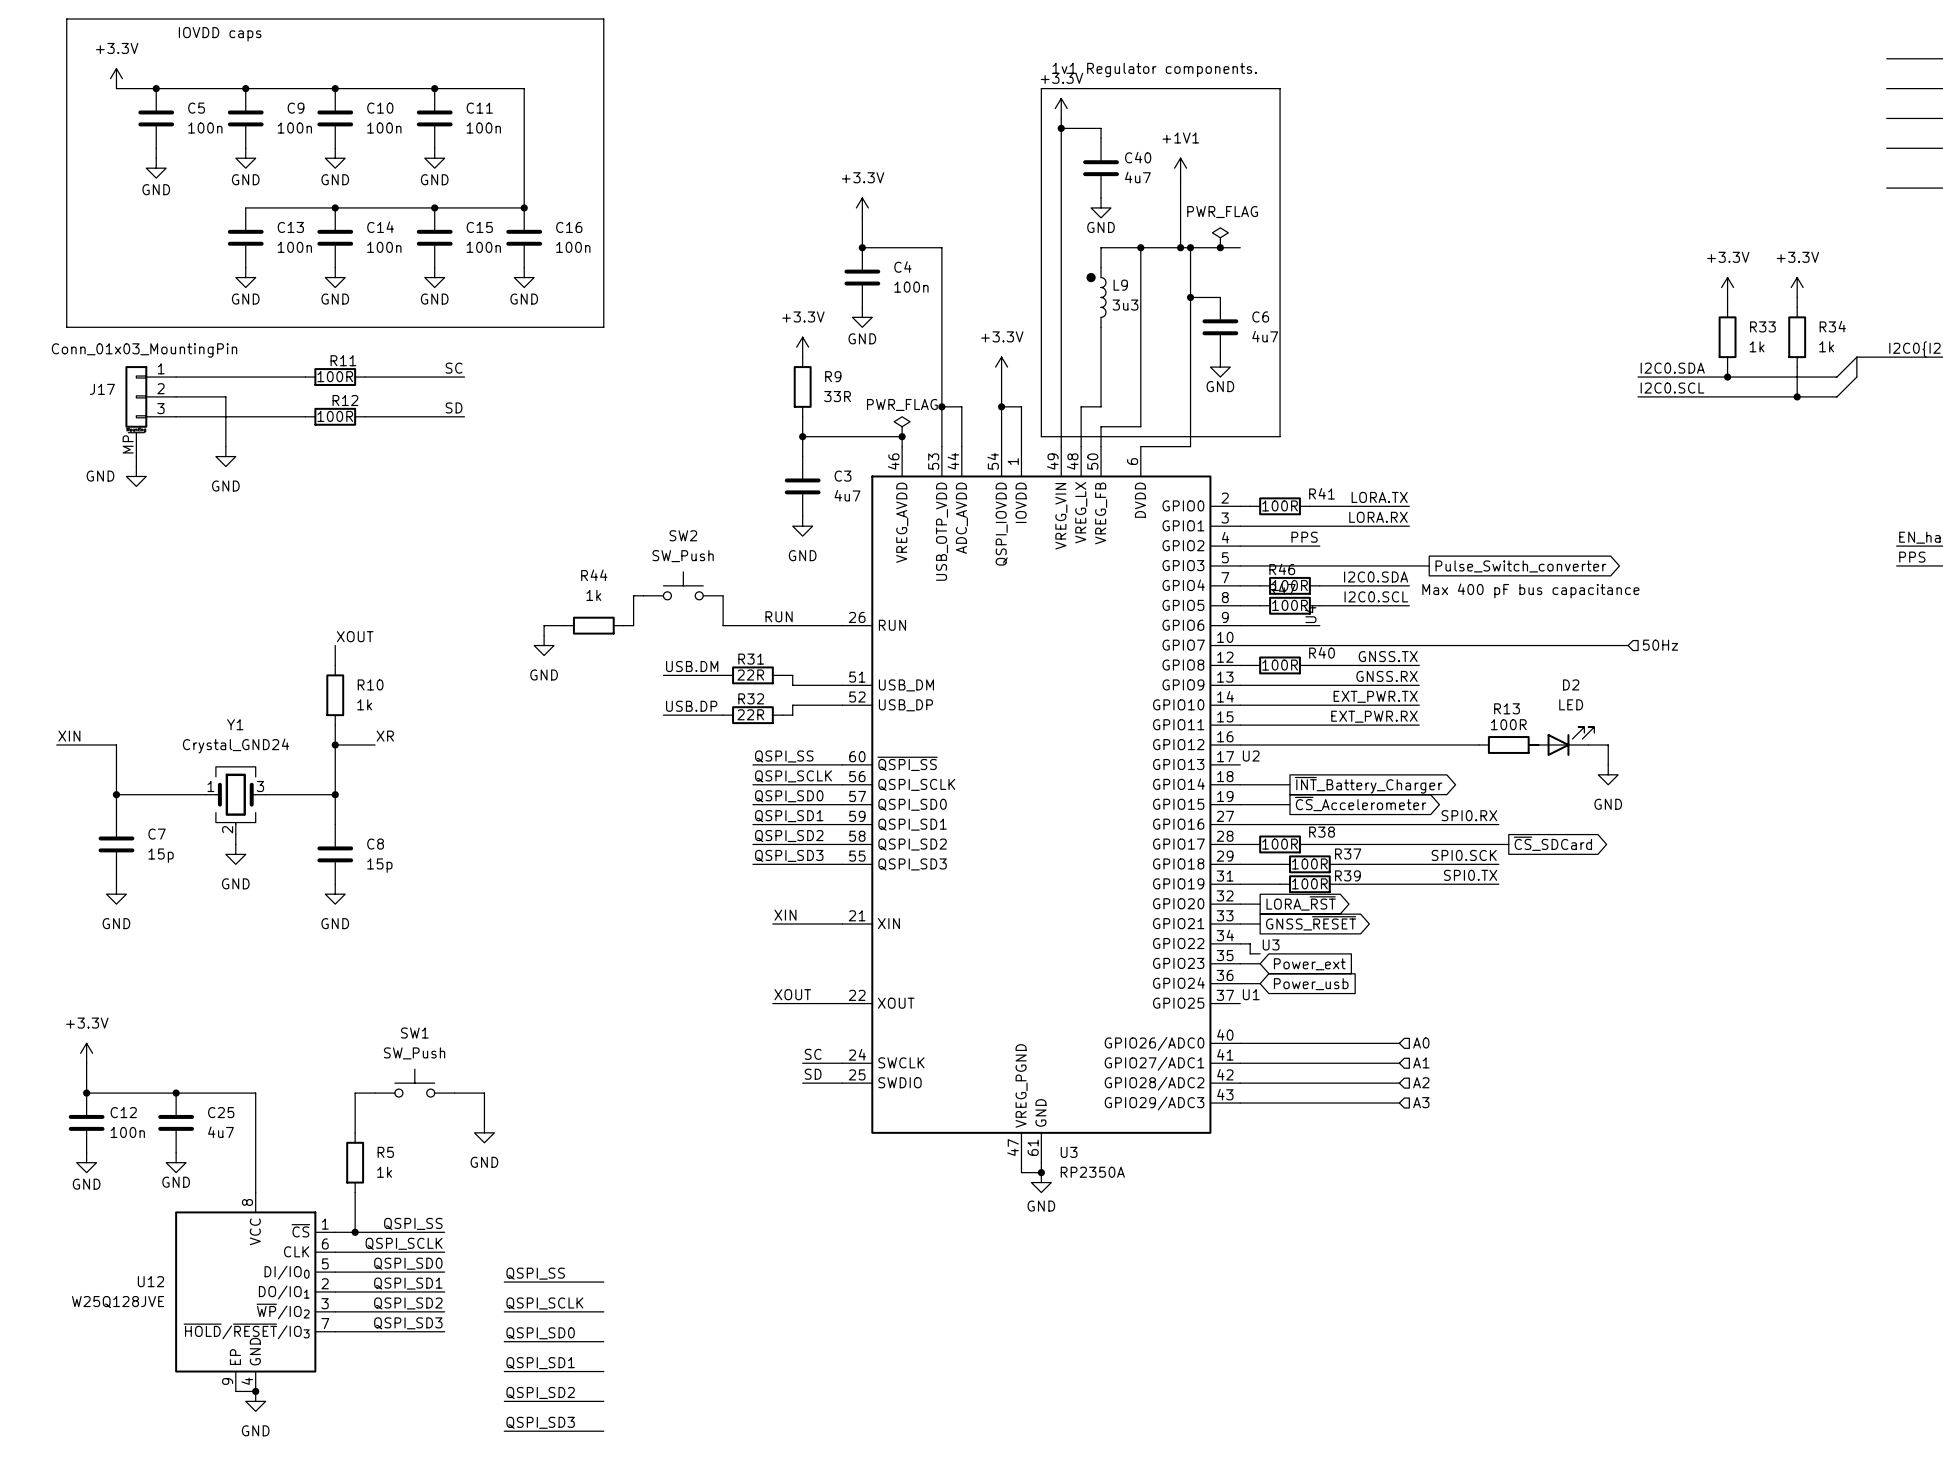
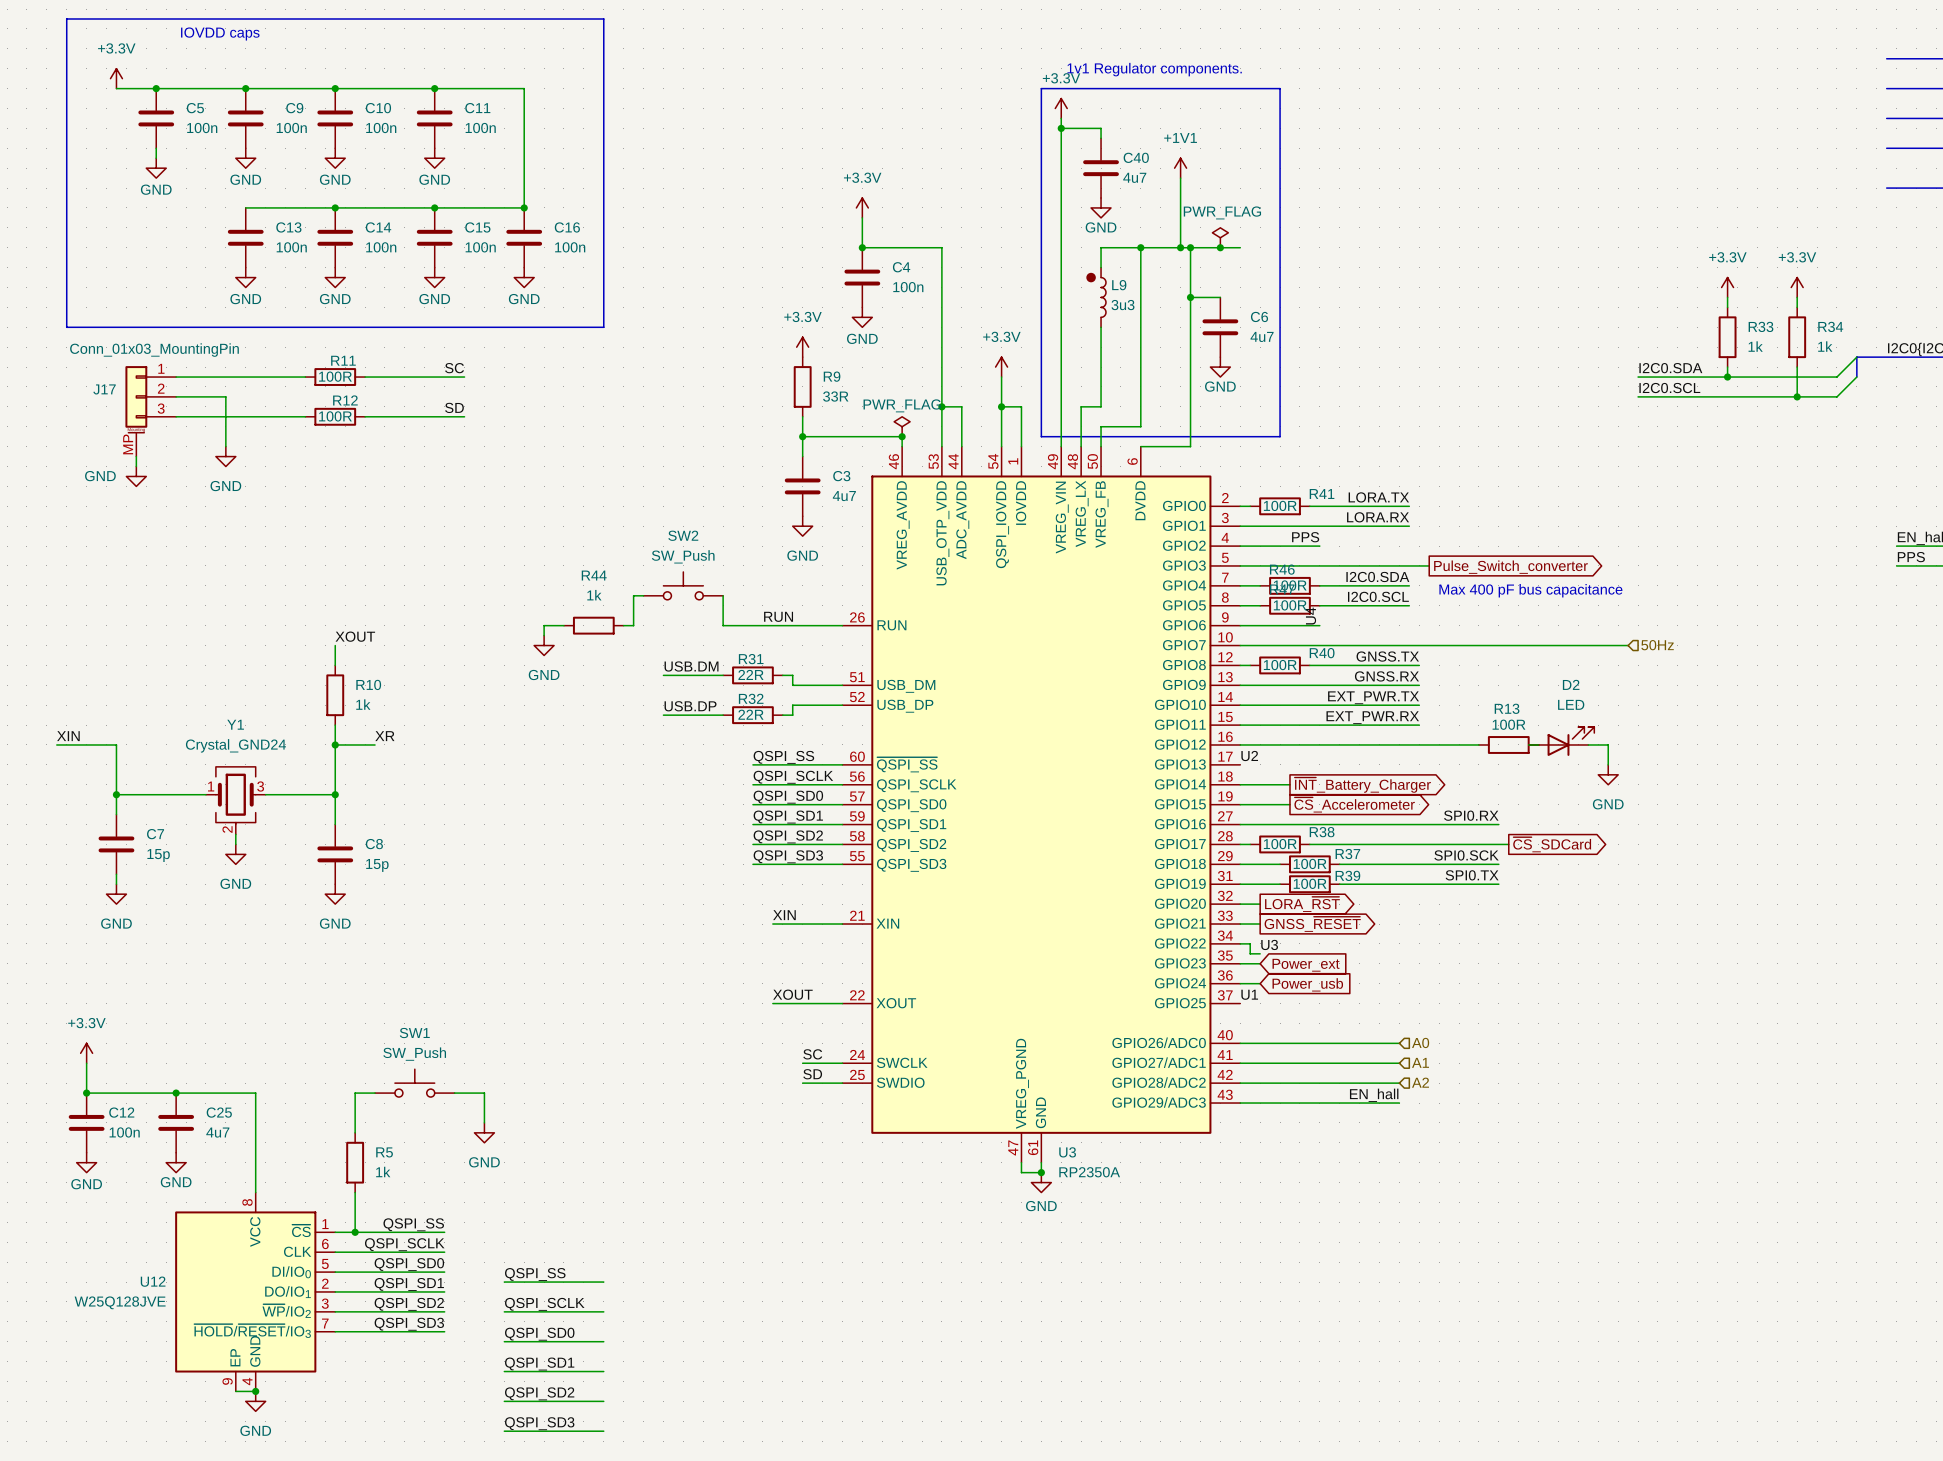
label: none -> EN_hall (1374, 1095)
hierarchical label: A3 (1421, 1102) -> none

